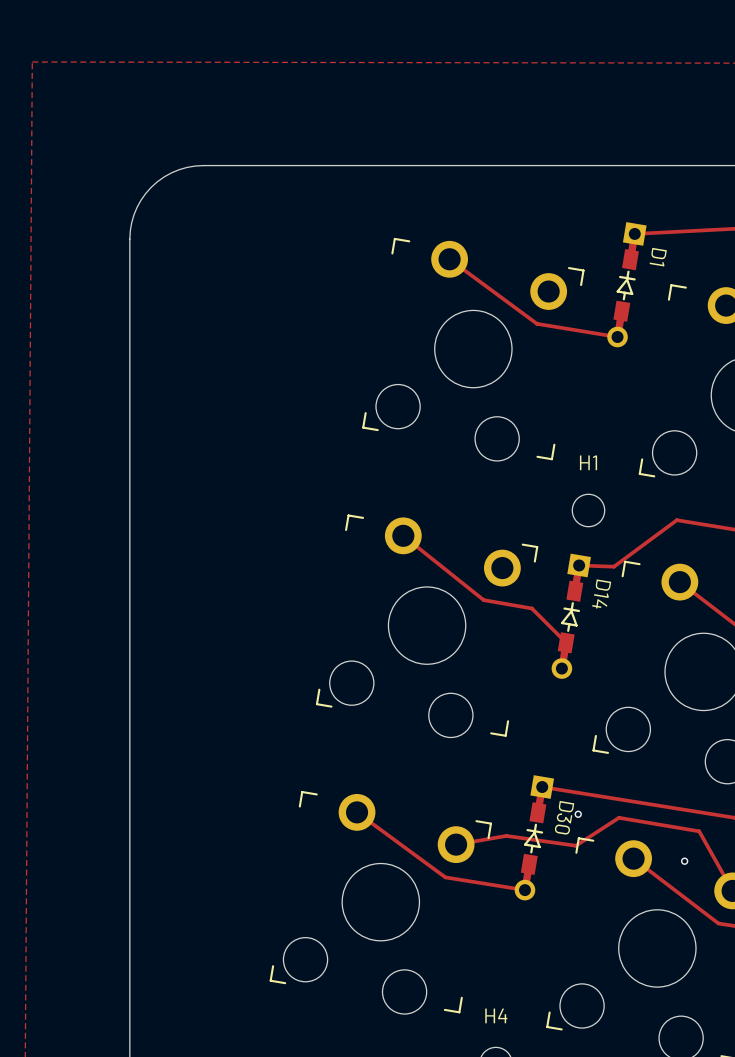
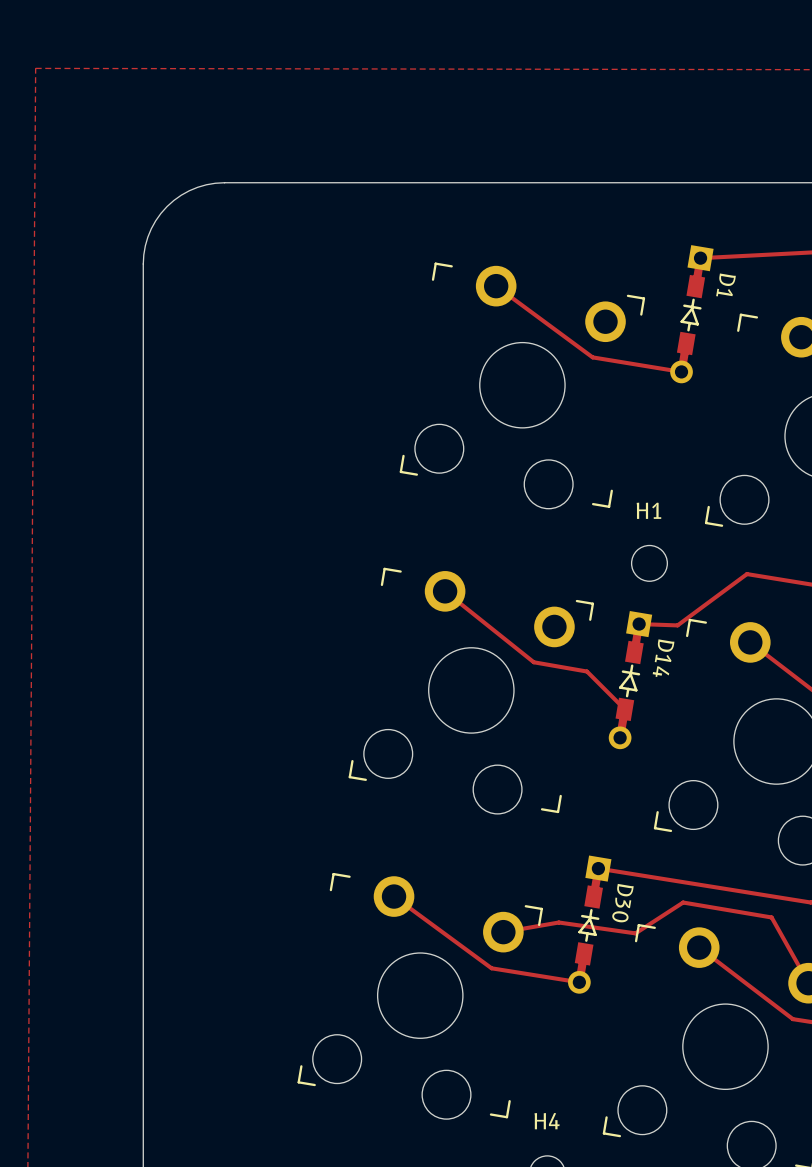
via: (578, 814) -> none
via: (684, 861) -> none

